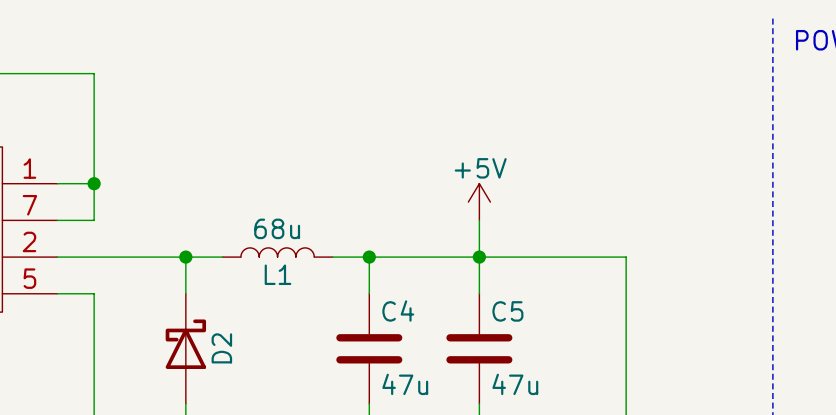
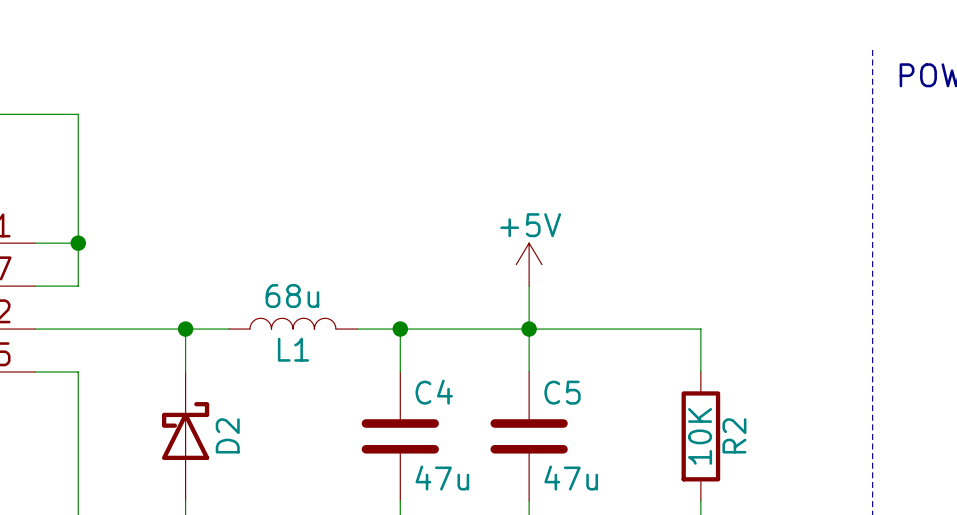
wire: (626, 293) (626, 403) -> none
R2: none -> 10K (700, 436)

